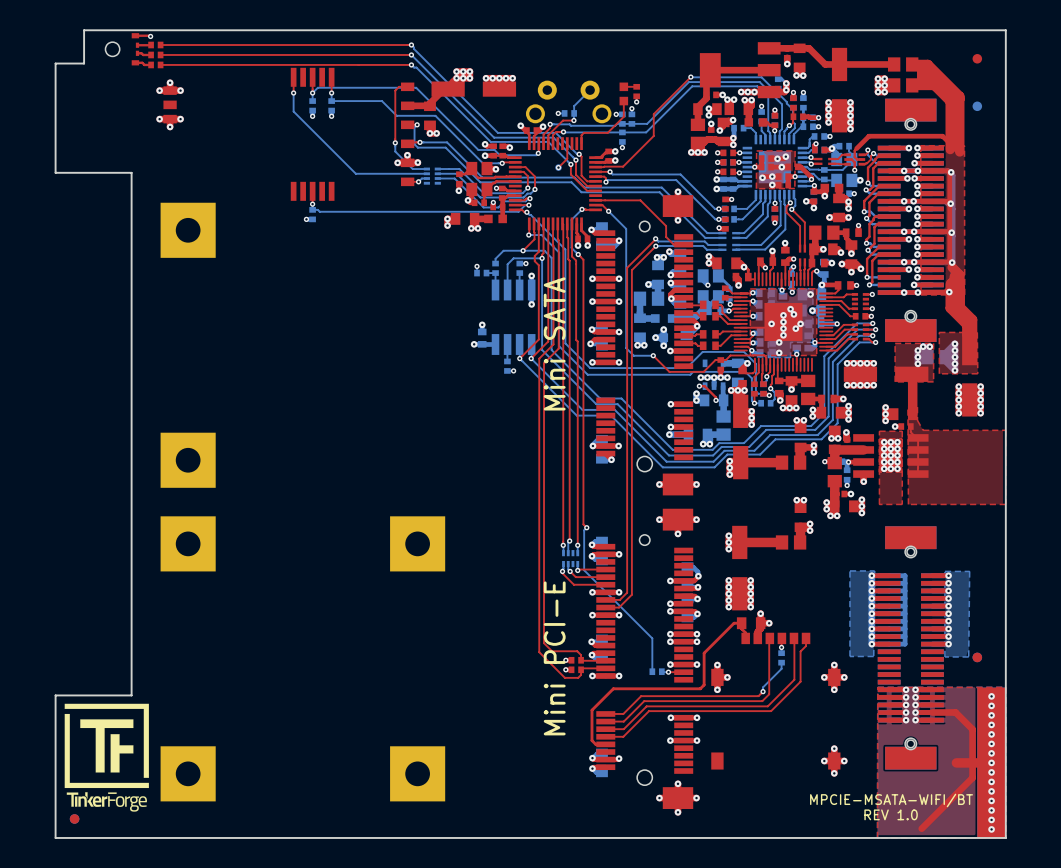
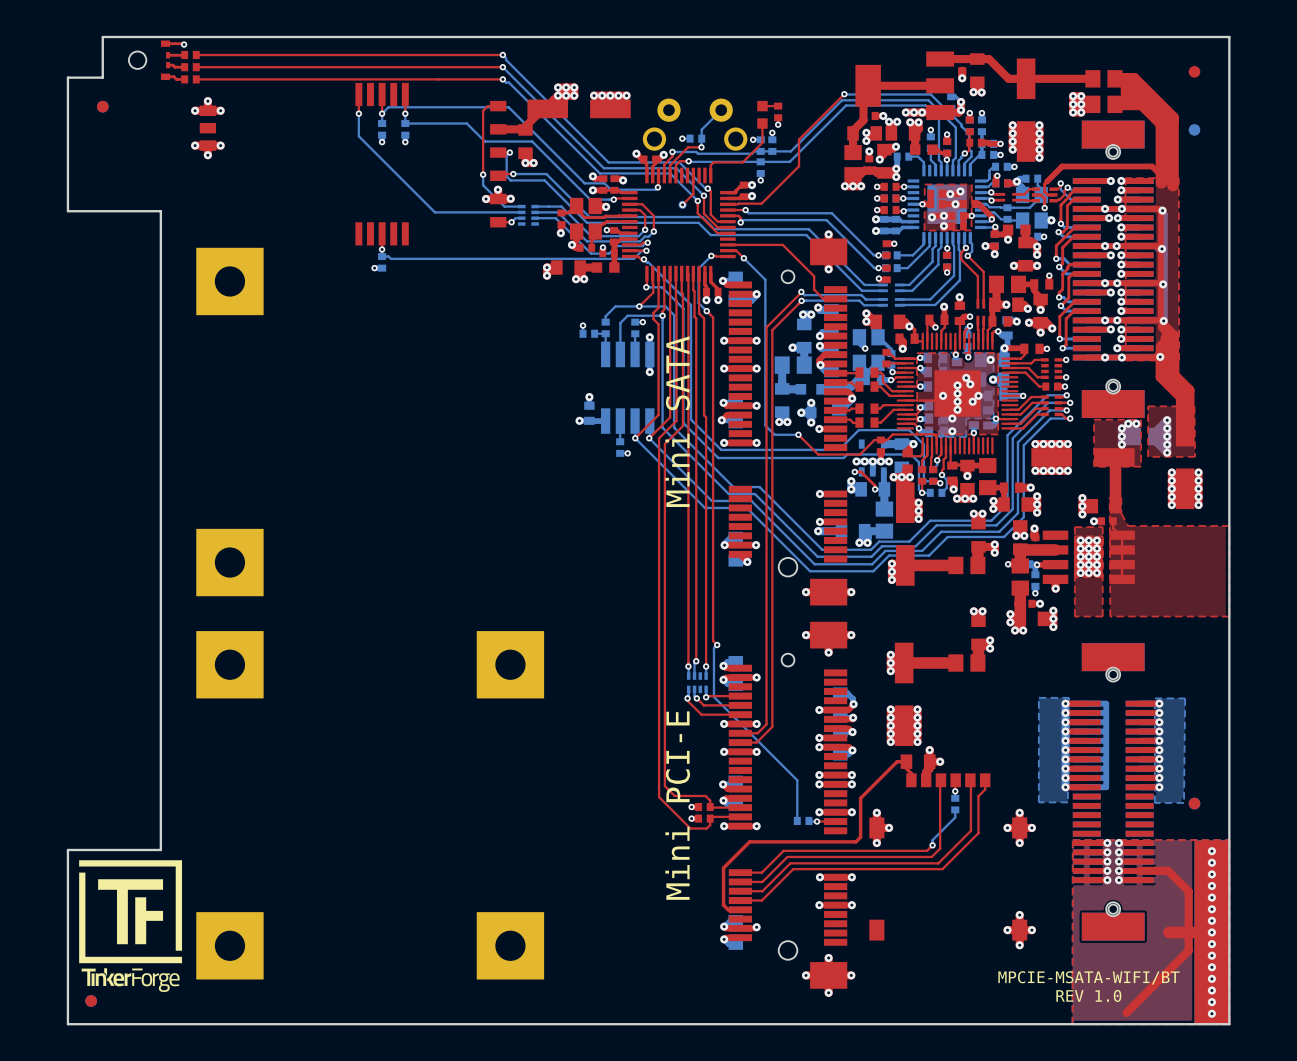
part: none -> (102, 106)

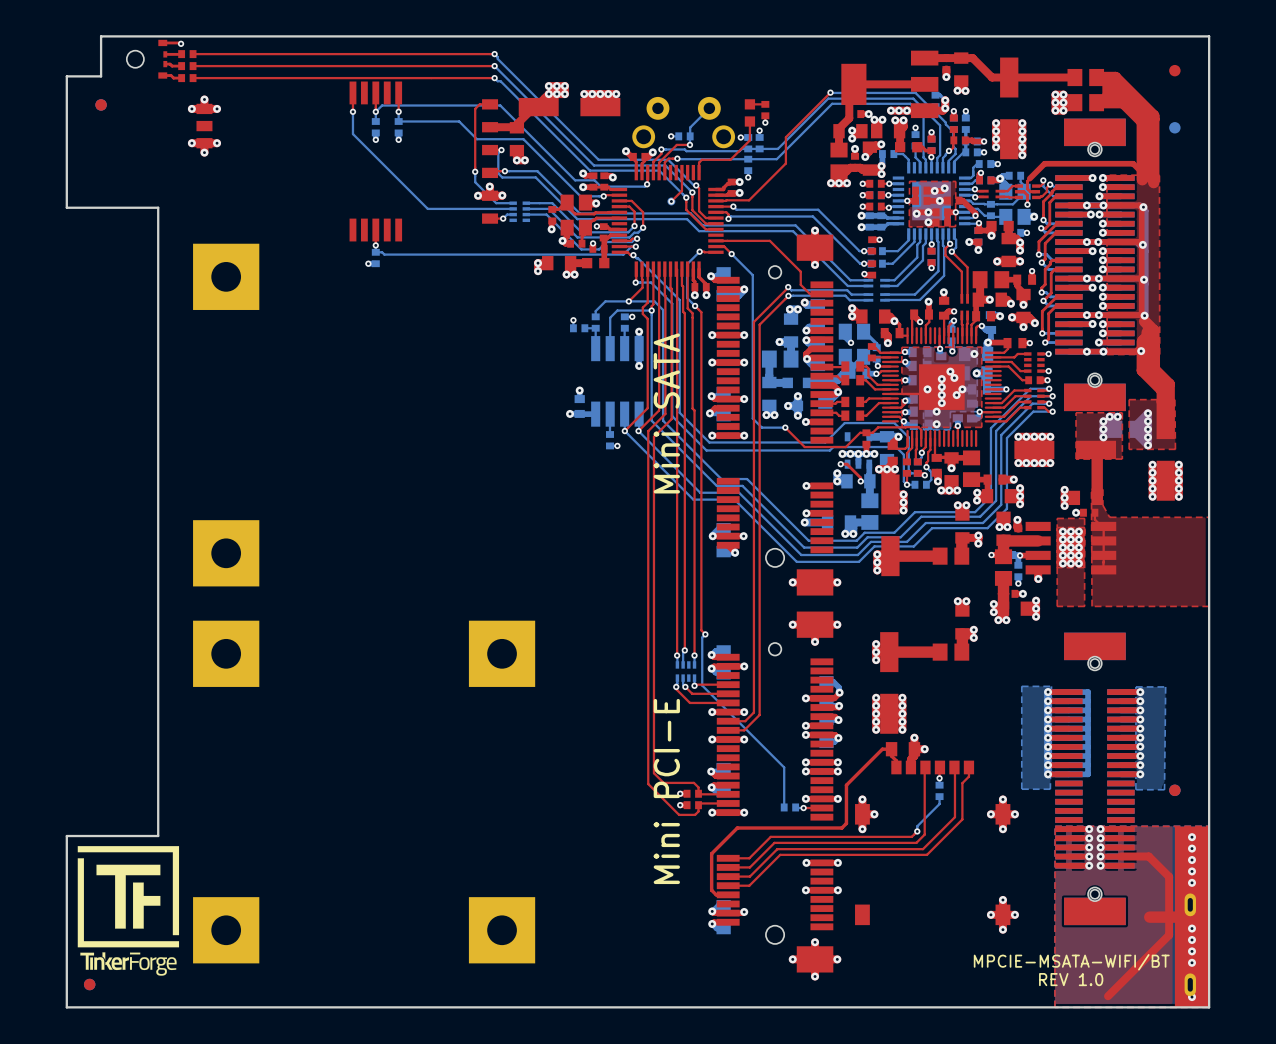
part footprint: [1194, 840, 1230, 1025] -> [1174, 826, 1210, 1008]
via: (1211, 909) -> none
via: (1211, 920) -> none
via: (1211, 932) -> none
via: (1211, 990) -> none
via: (1211, 1002) -> none

